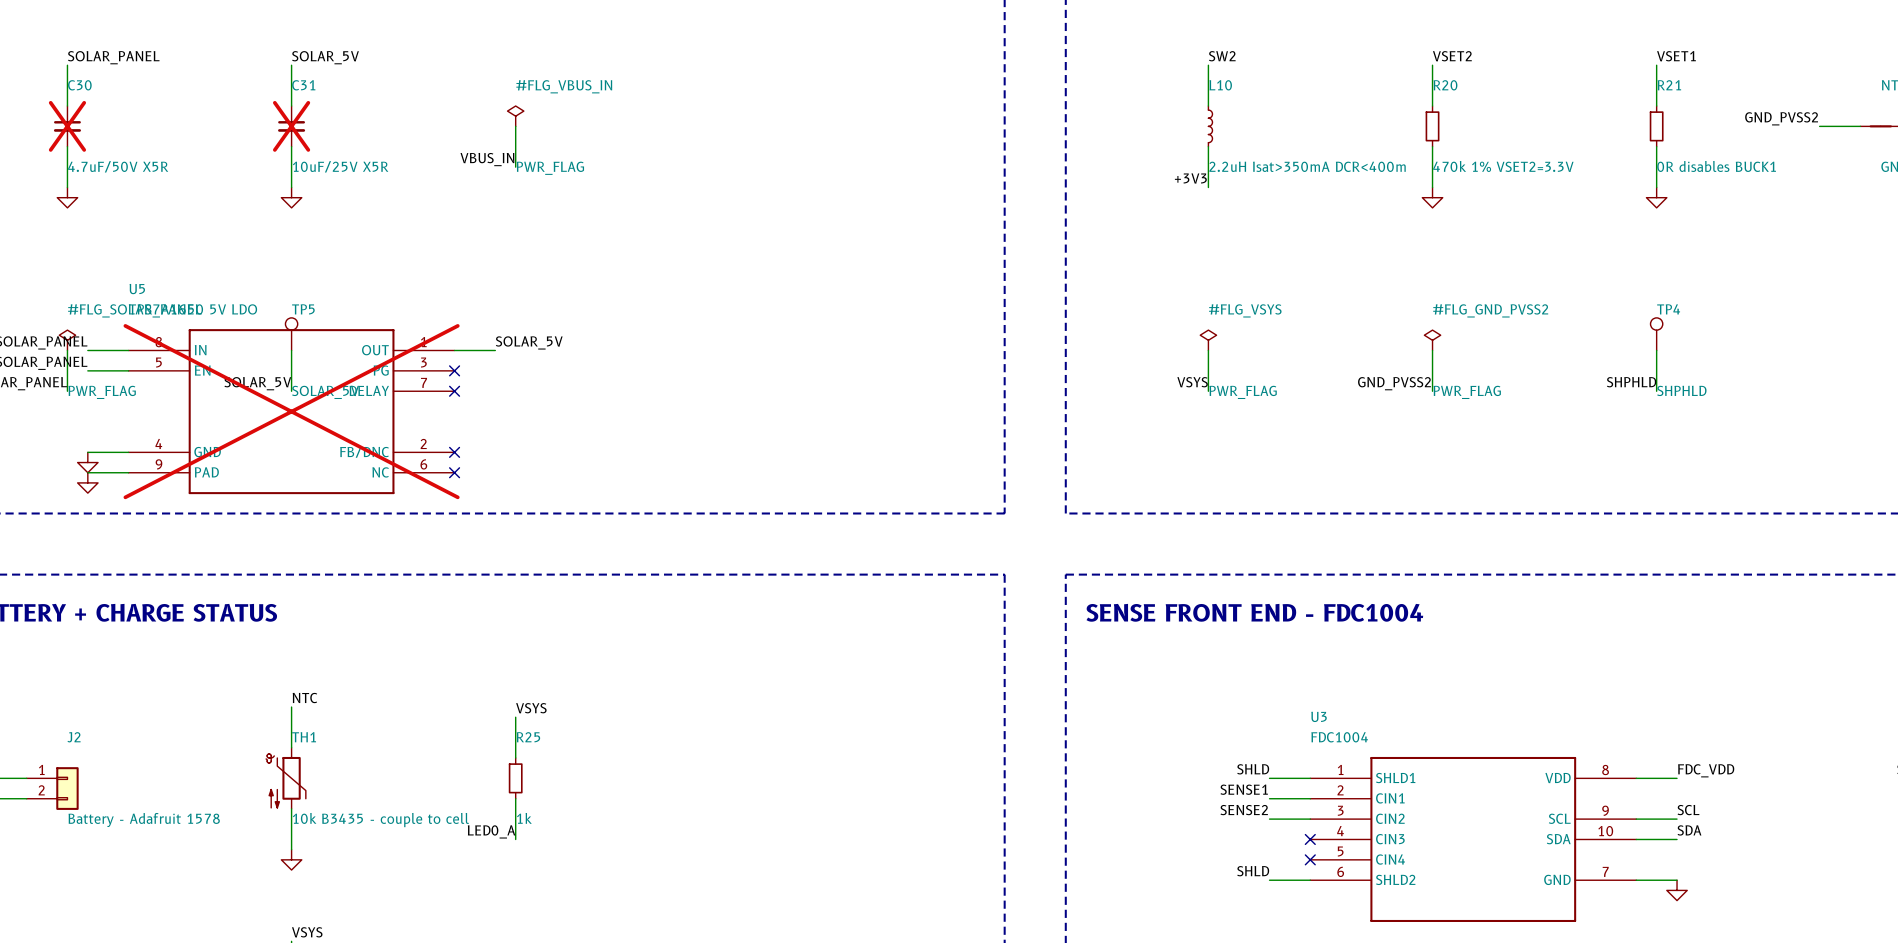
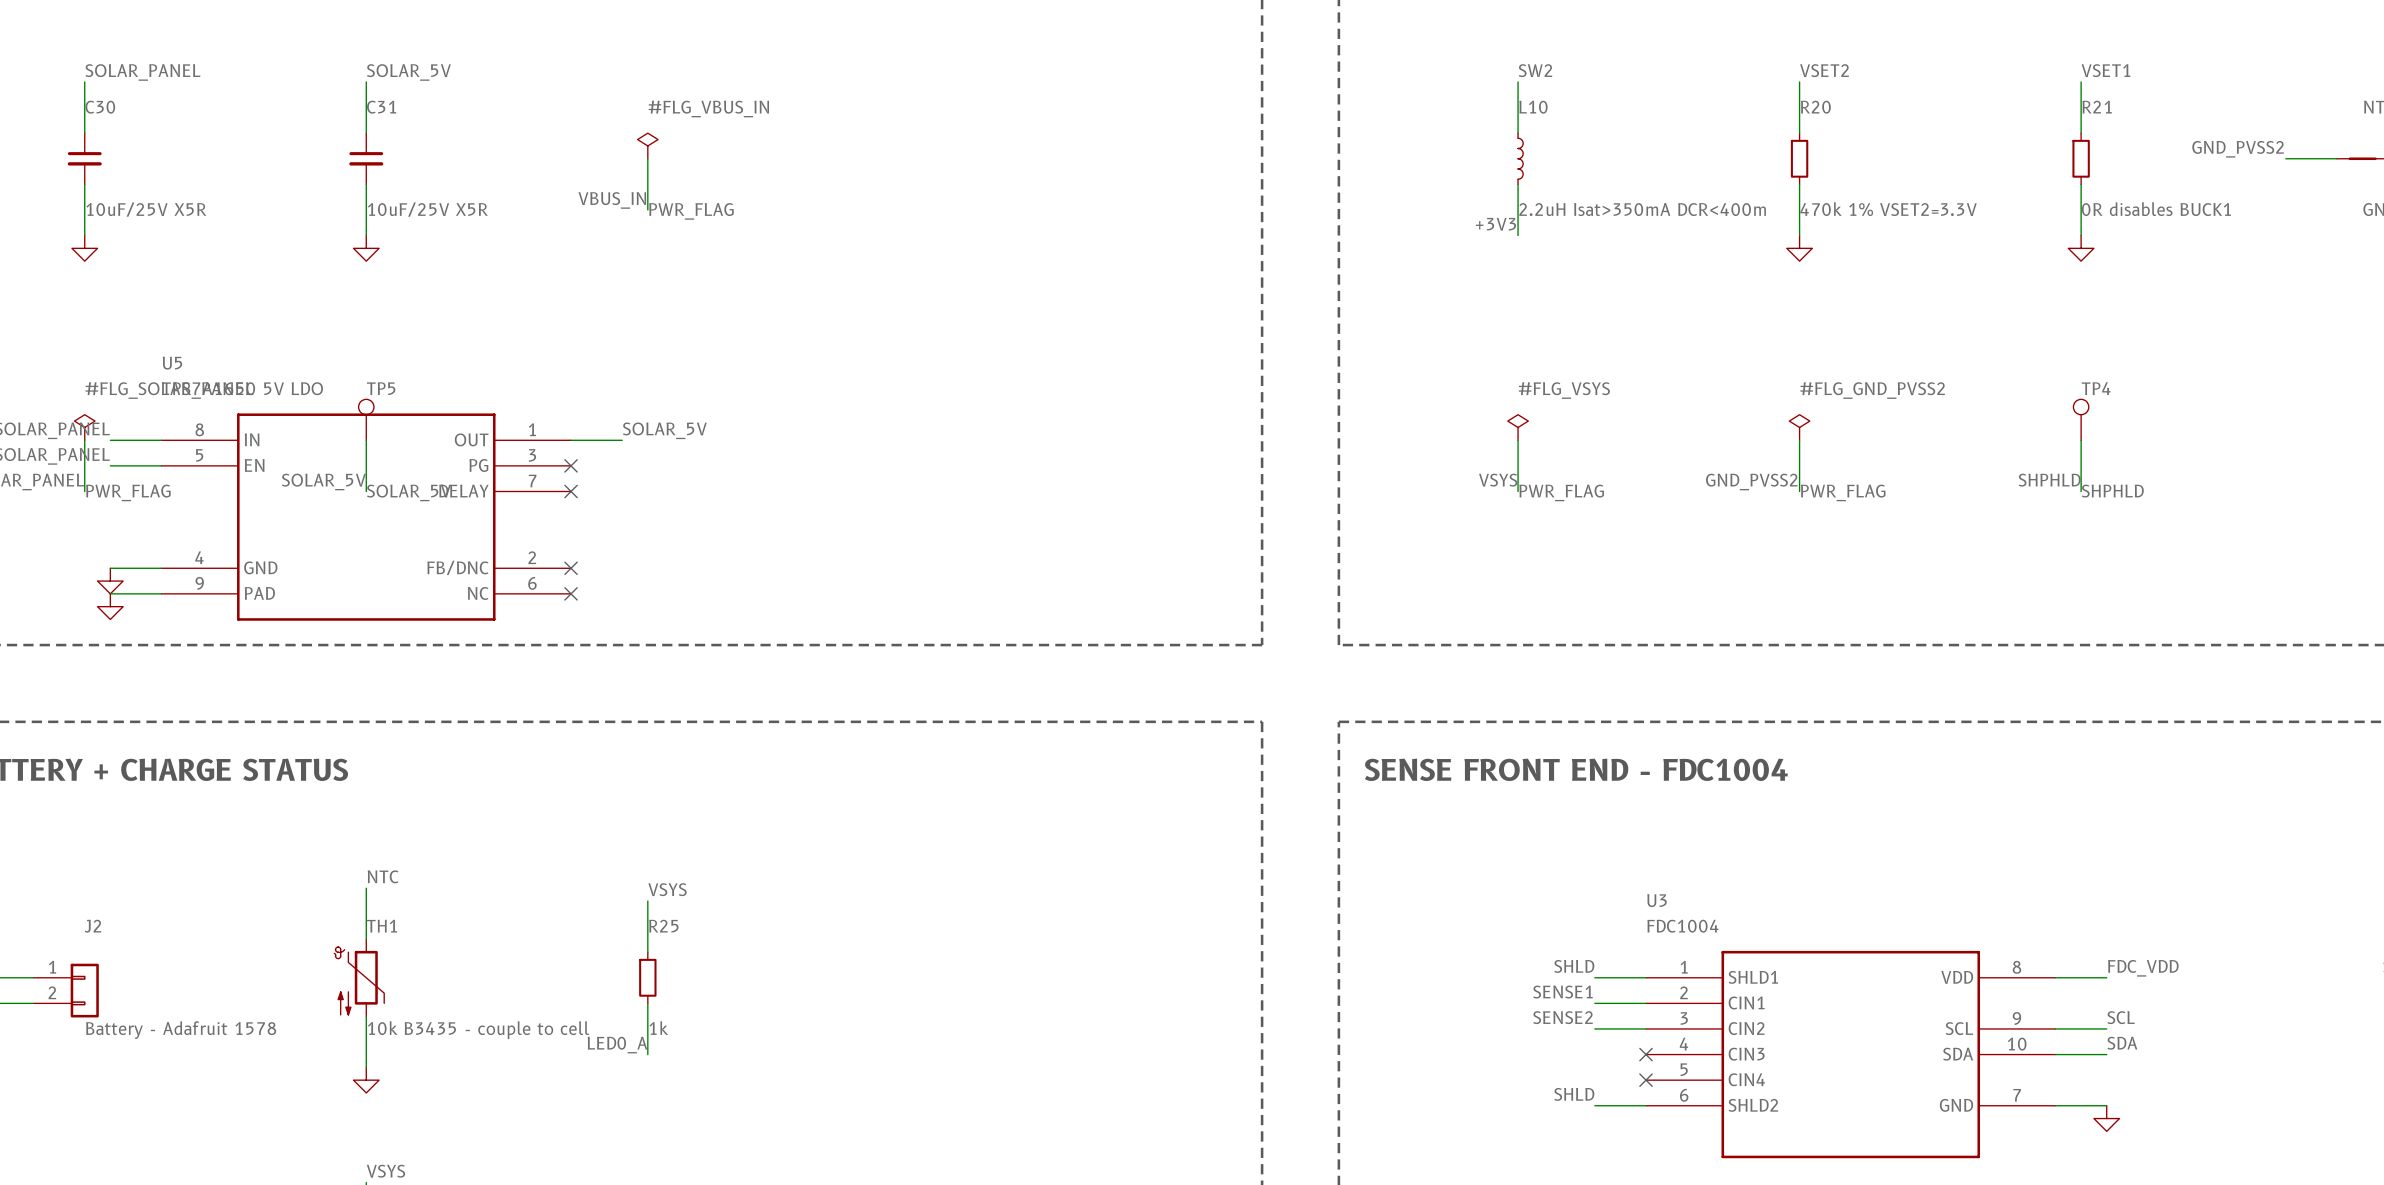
C30 do-not-place cross: (67, 126) -> none
C31 do-not-place cross: (291, 126) -> none
C30 value: 4.7uF/50V X5R (118, 166) -> 10uF/25V X5R (146, 209)
U5 do-not-place cross: (291, 411) -> none

